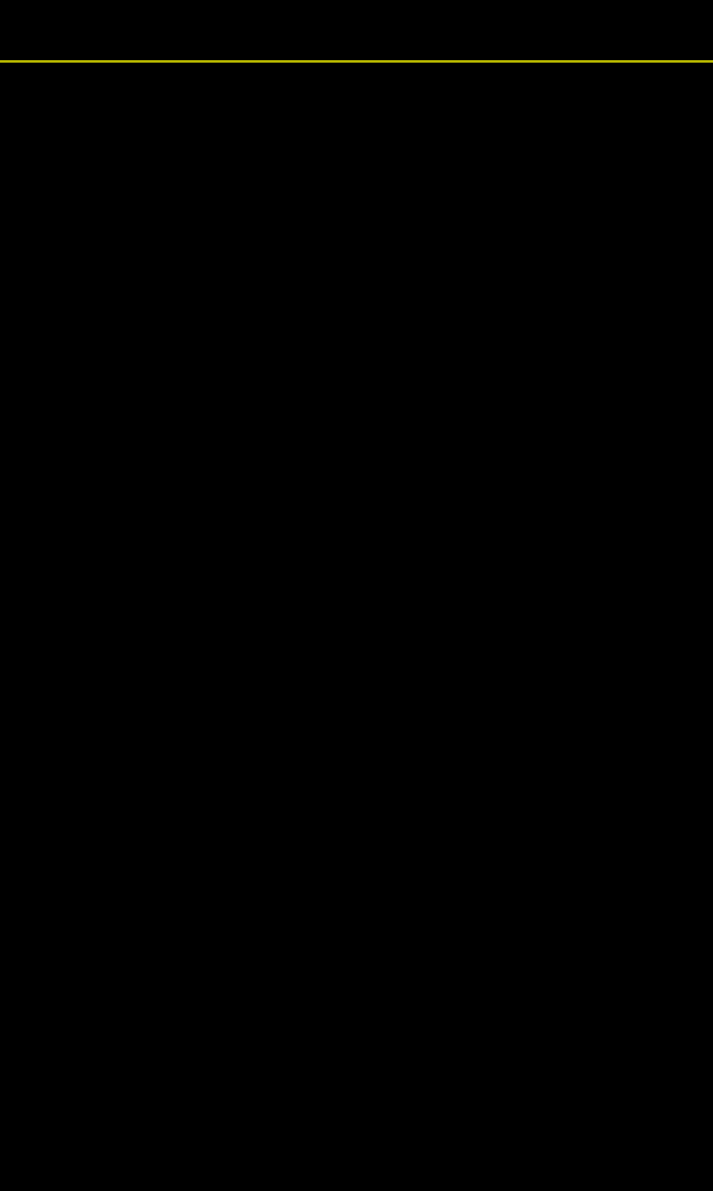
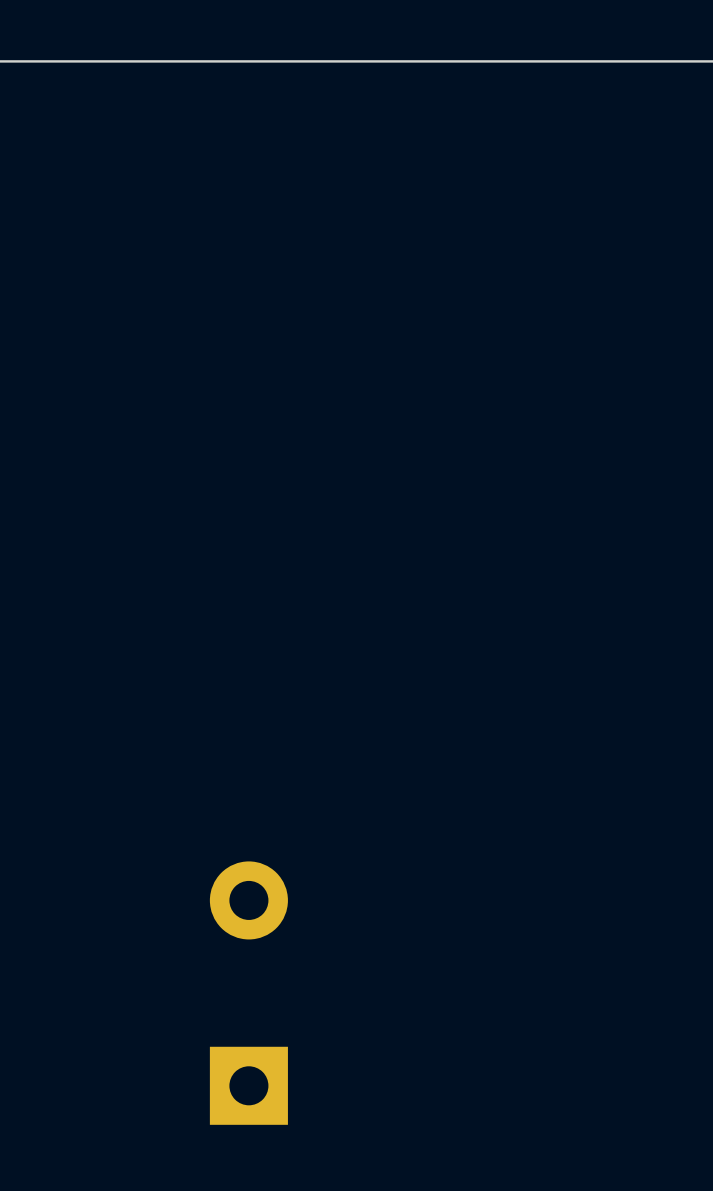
part: none -> (248, 993)

